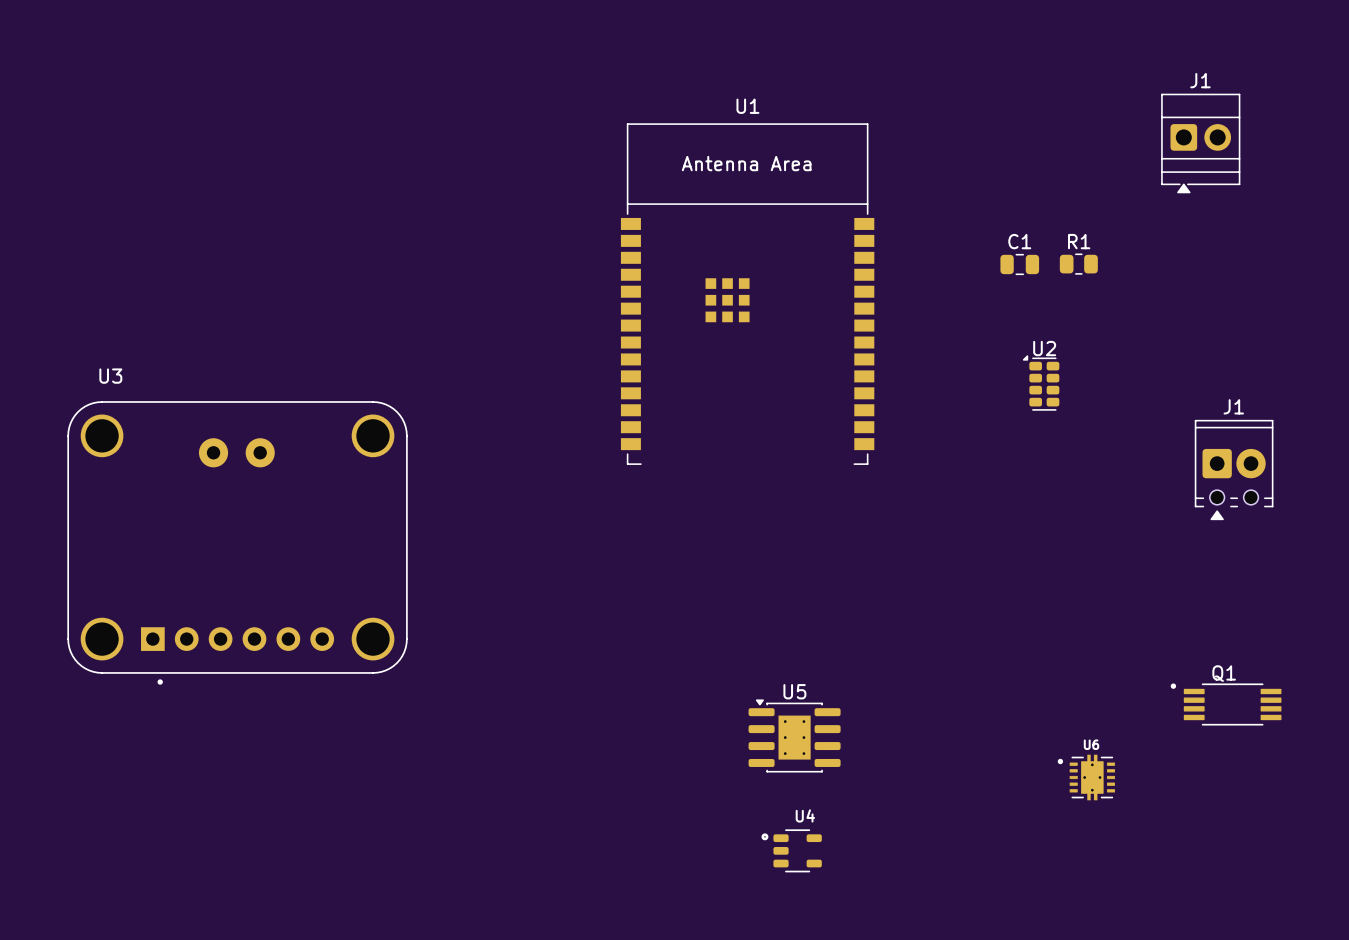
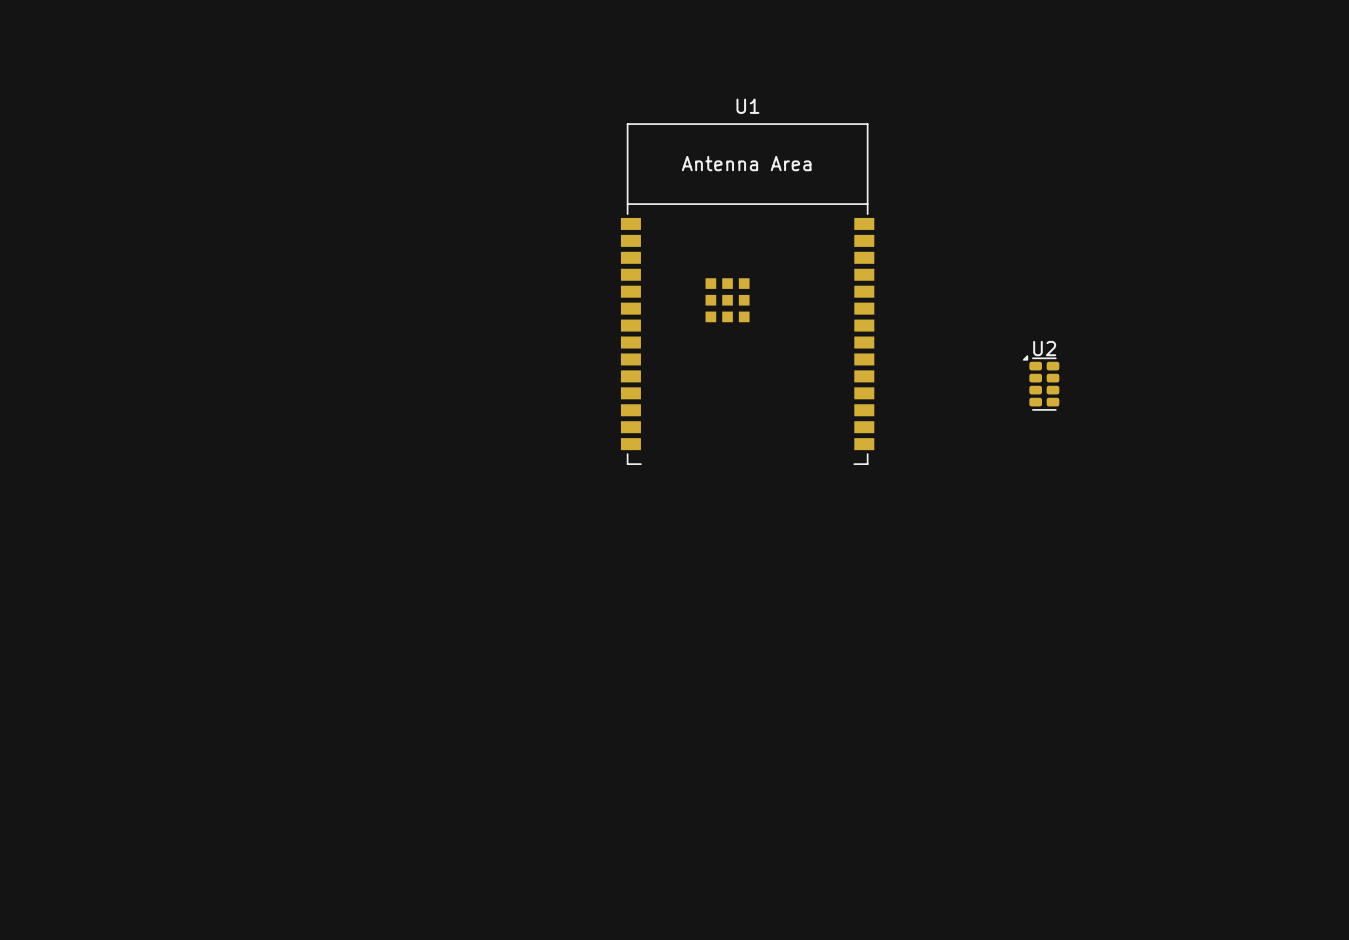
J1: (1200, 143) -> none
C1: (1019, 264) -> none
R1: (1078, 264) -> none
J1: (1234, 469) -> none
U3: (237, 542) -> none
Q1: (1226, 704) -> none
U5: (794, 735) -> none
U6: (1086, 777) -> none
U4: (791, 850) -> none

